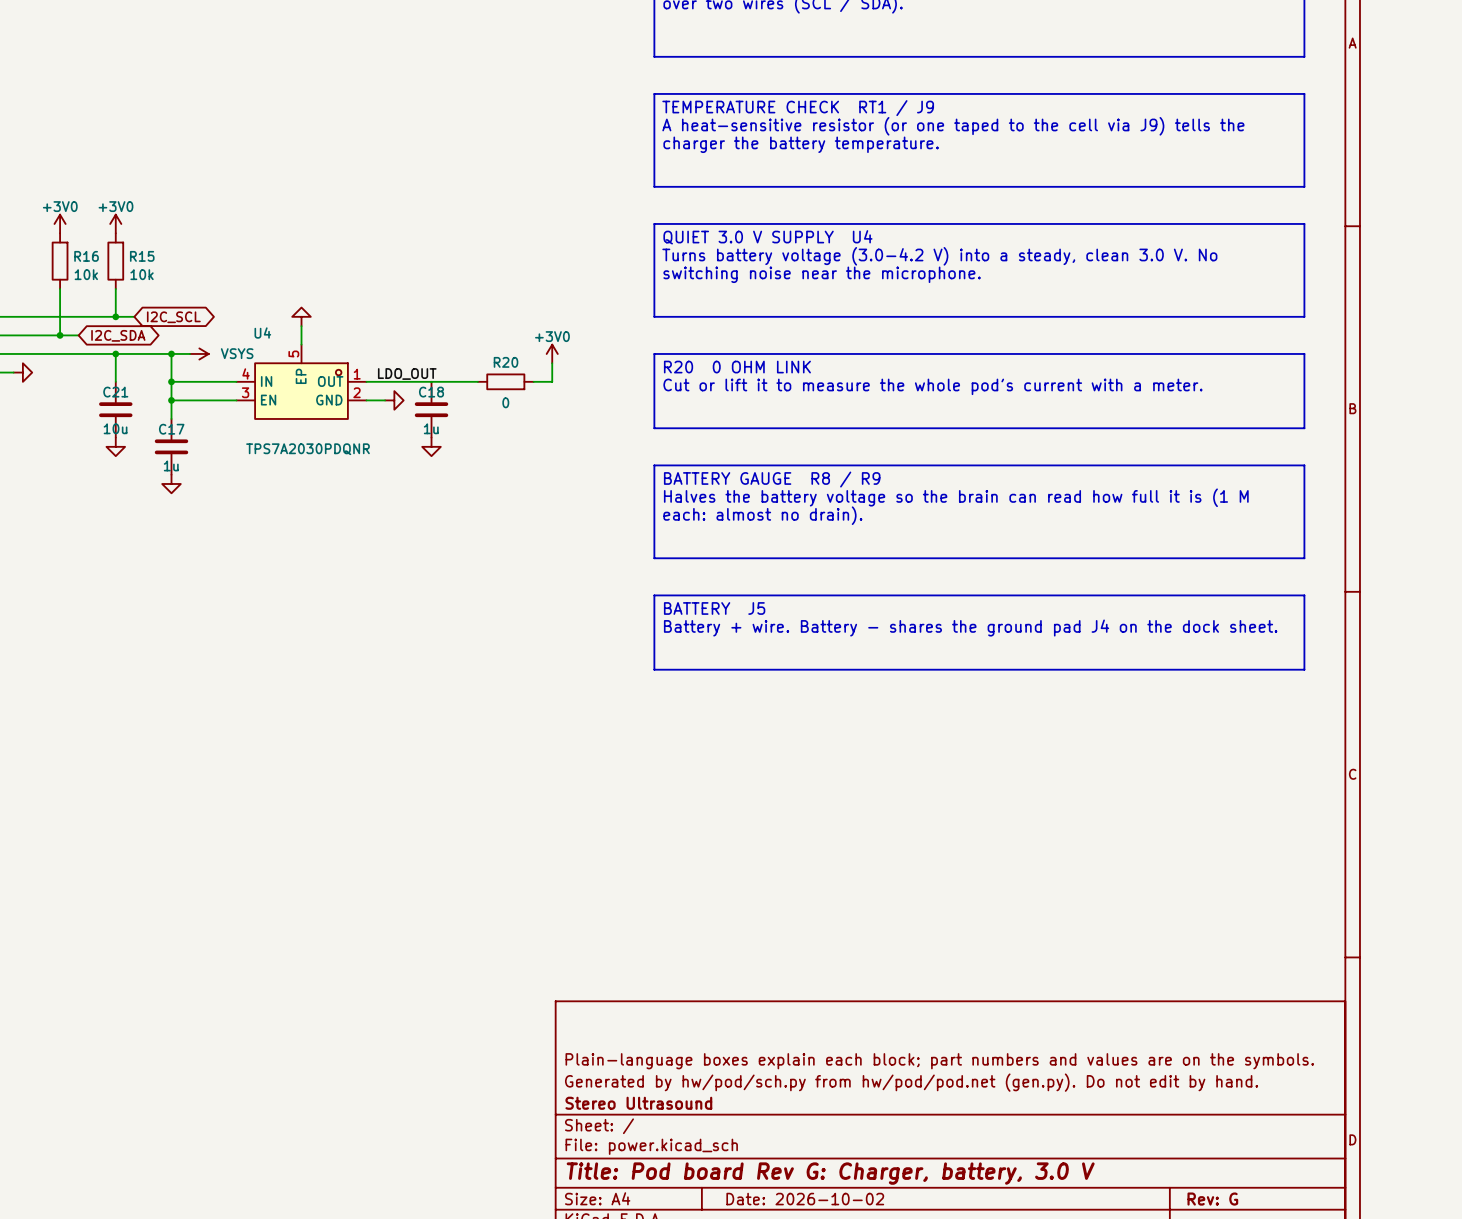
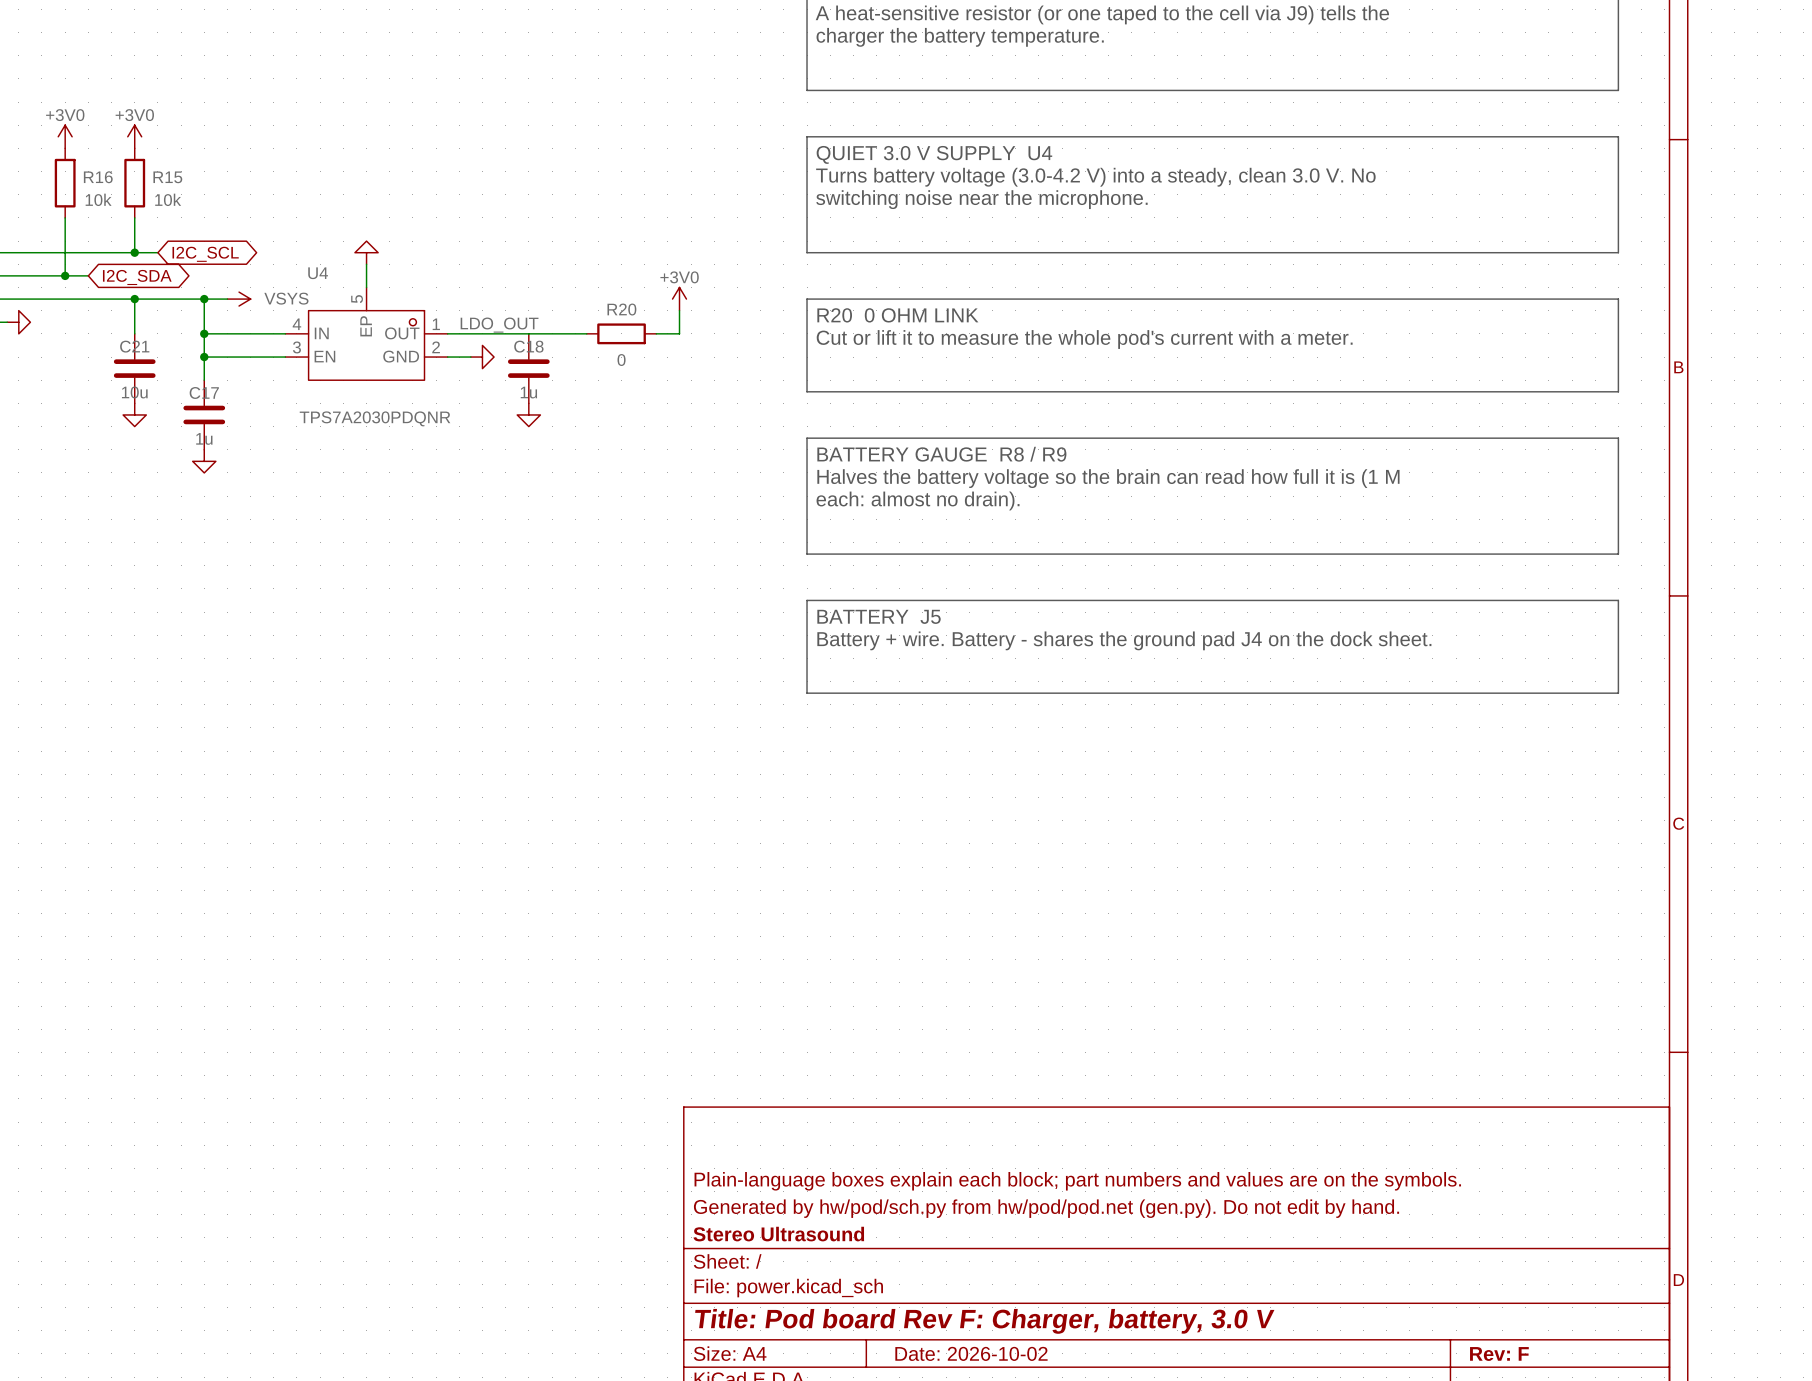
title block: Title: Pod board Rev G: Charger, battery, 3.0 V (830, 1173) -> Title: Pod board Rev F: Charger, battery, 3.0 V (984, 1321)
title block: Rev: G (1212, 1199) -> Rev: F (1499, 1353)

